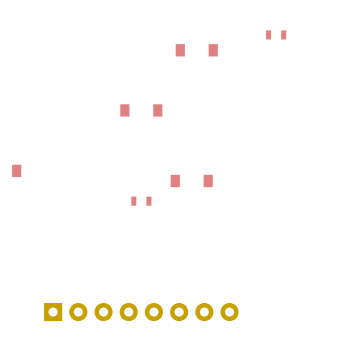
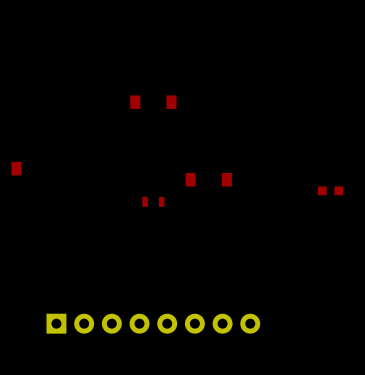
part: (276, 34) -> none
part: (196, 50) -> none
part: none -> (330, 190)

